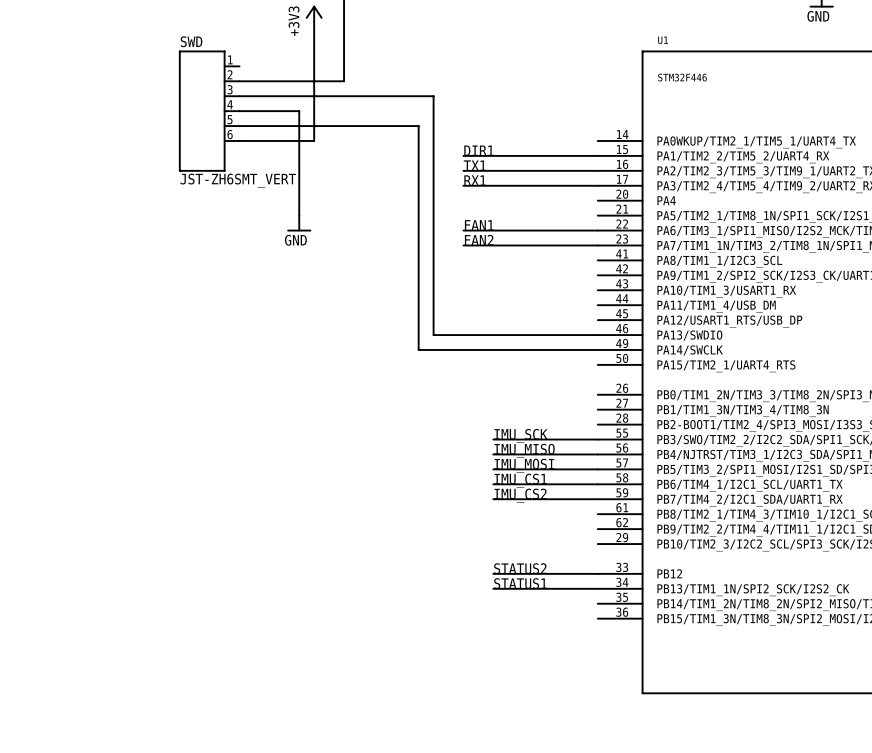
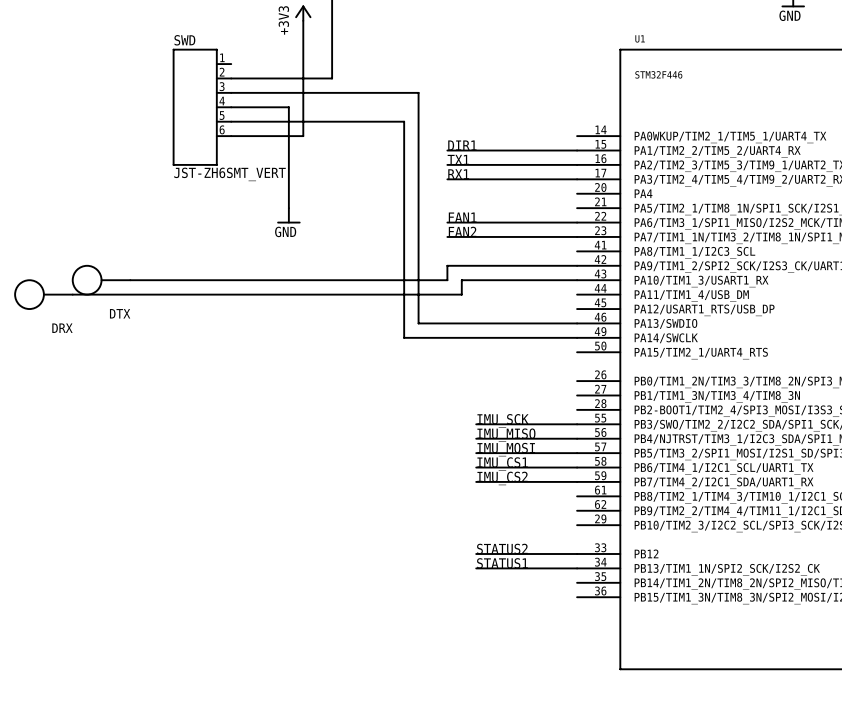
wire: none -> (577, 265) (447, 265) (447, 280) (130, 280)
DTX: none -> (101, 280)
wire: none -> (577, 280) (461, 280) (461, 294) (72, 294)
DRX: none -> (43, 294)

